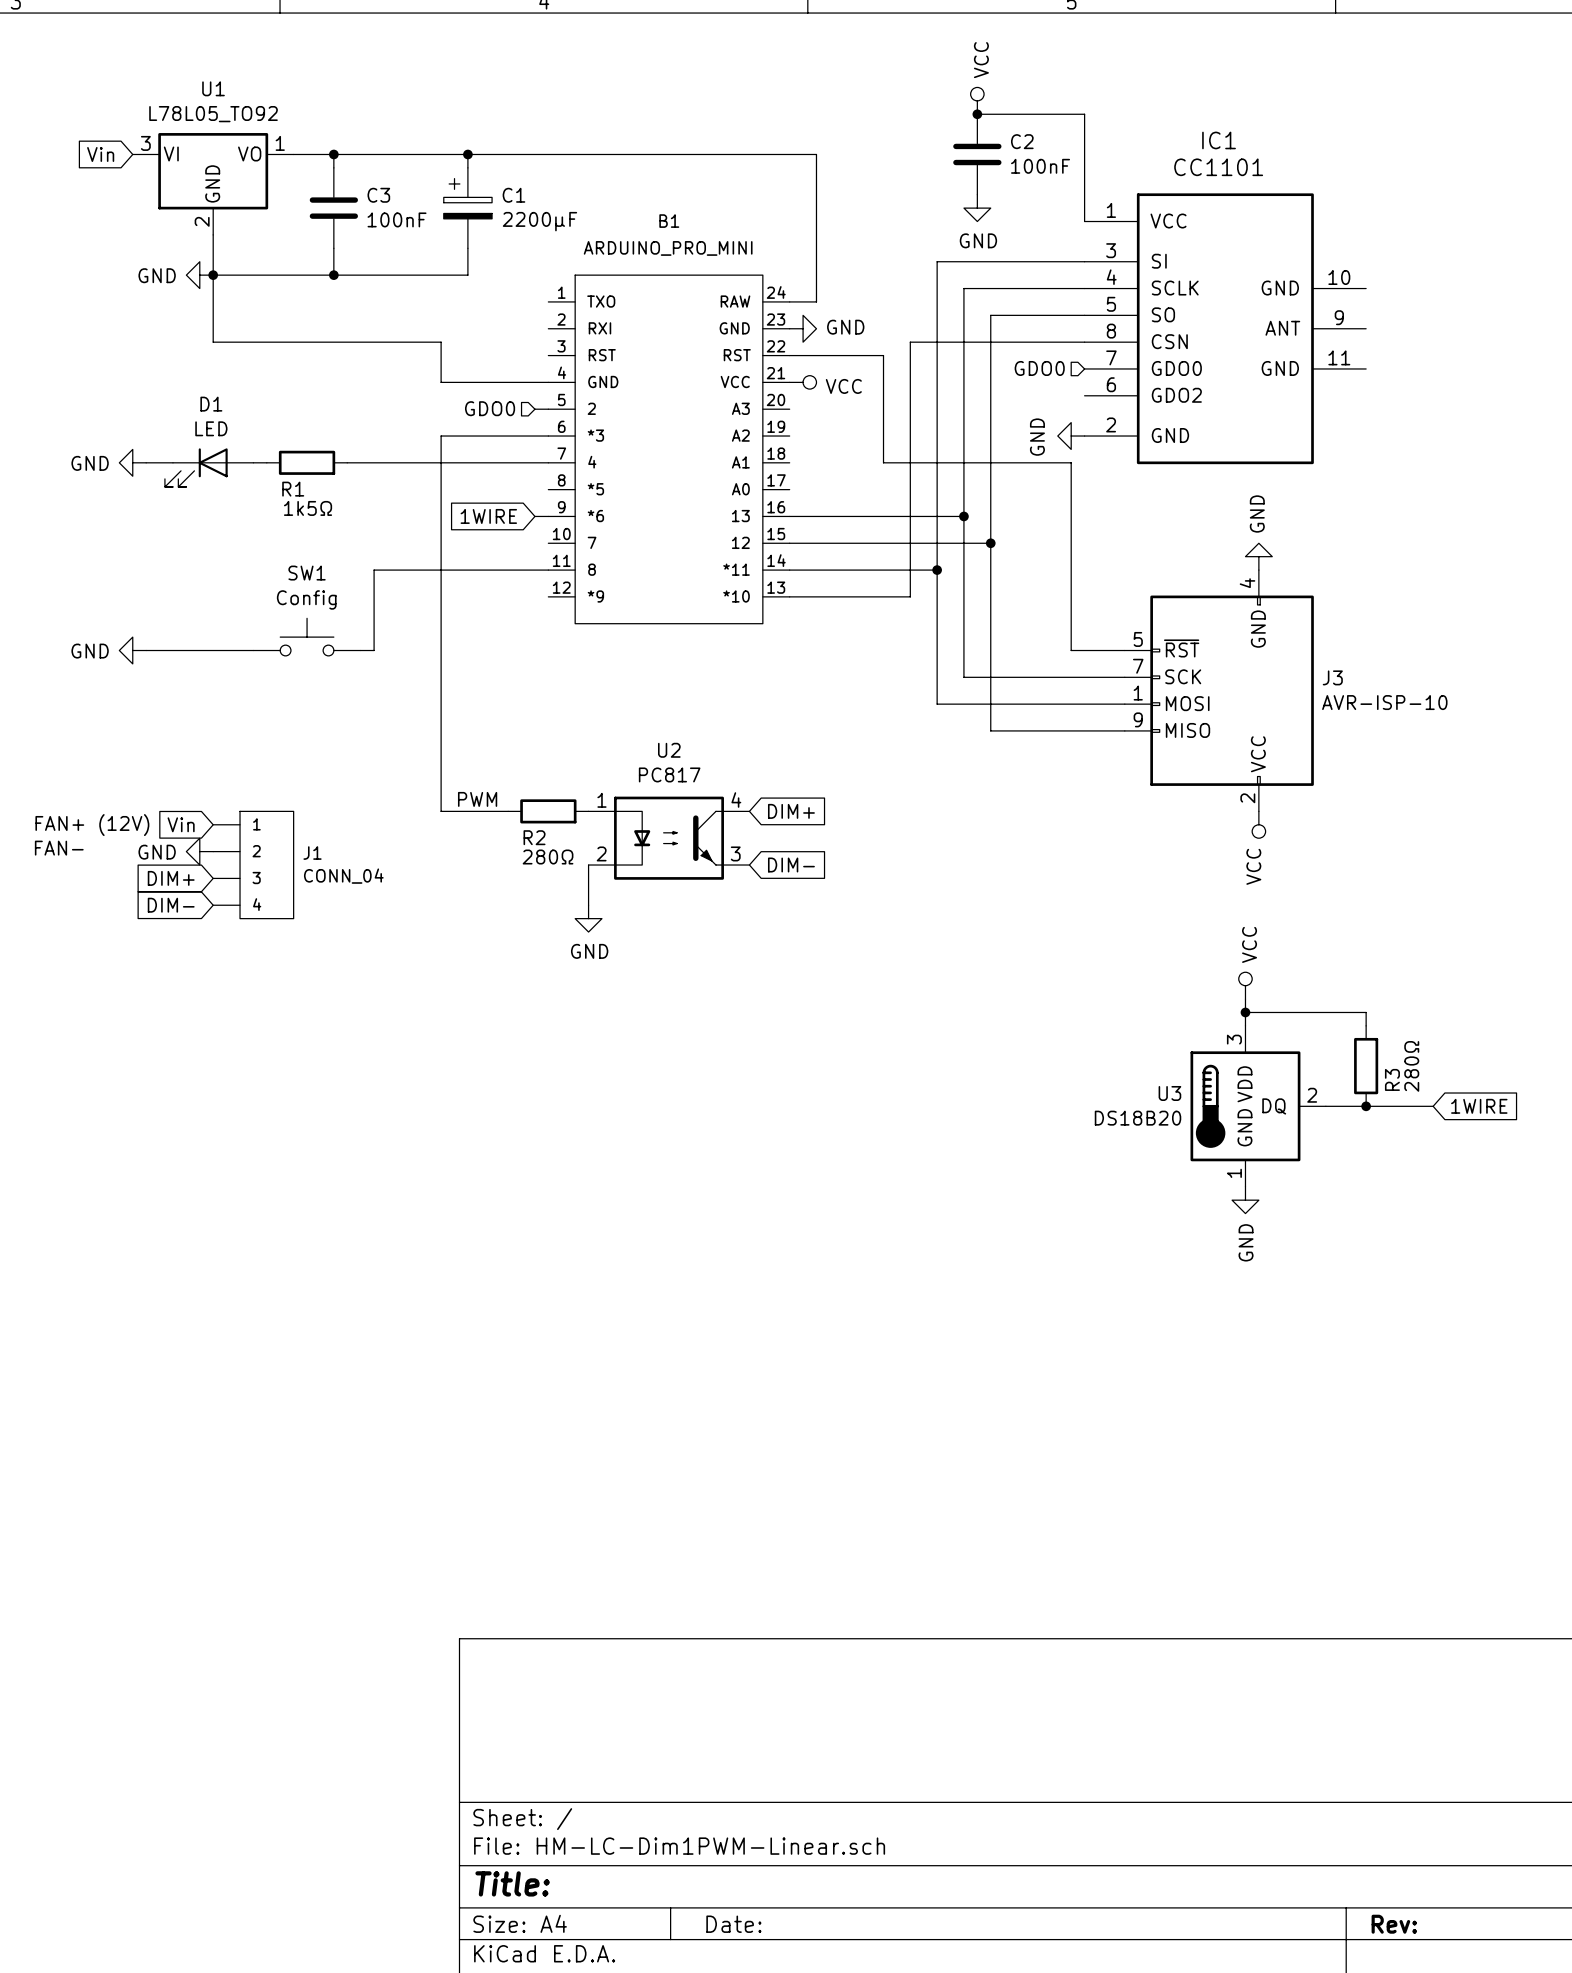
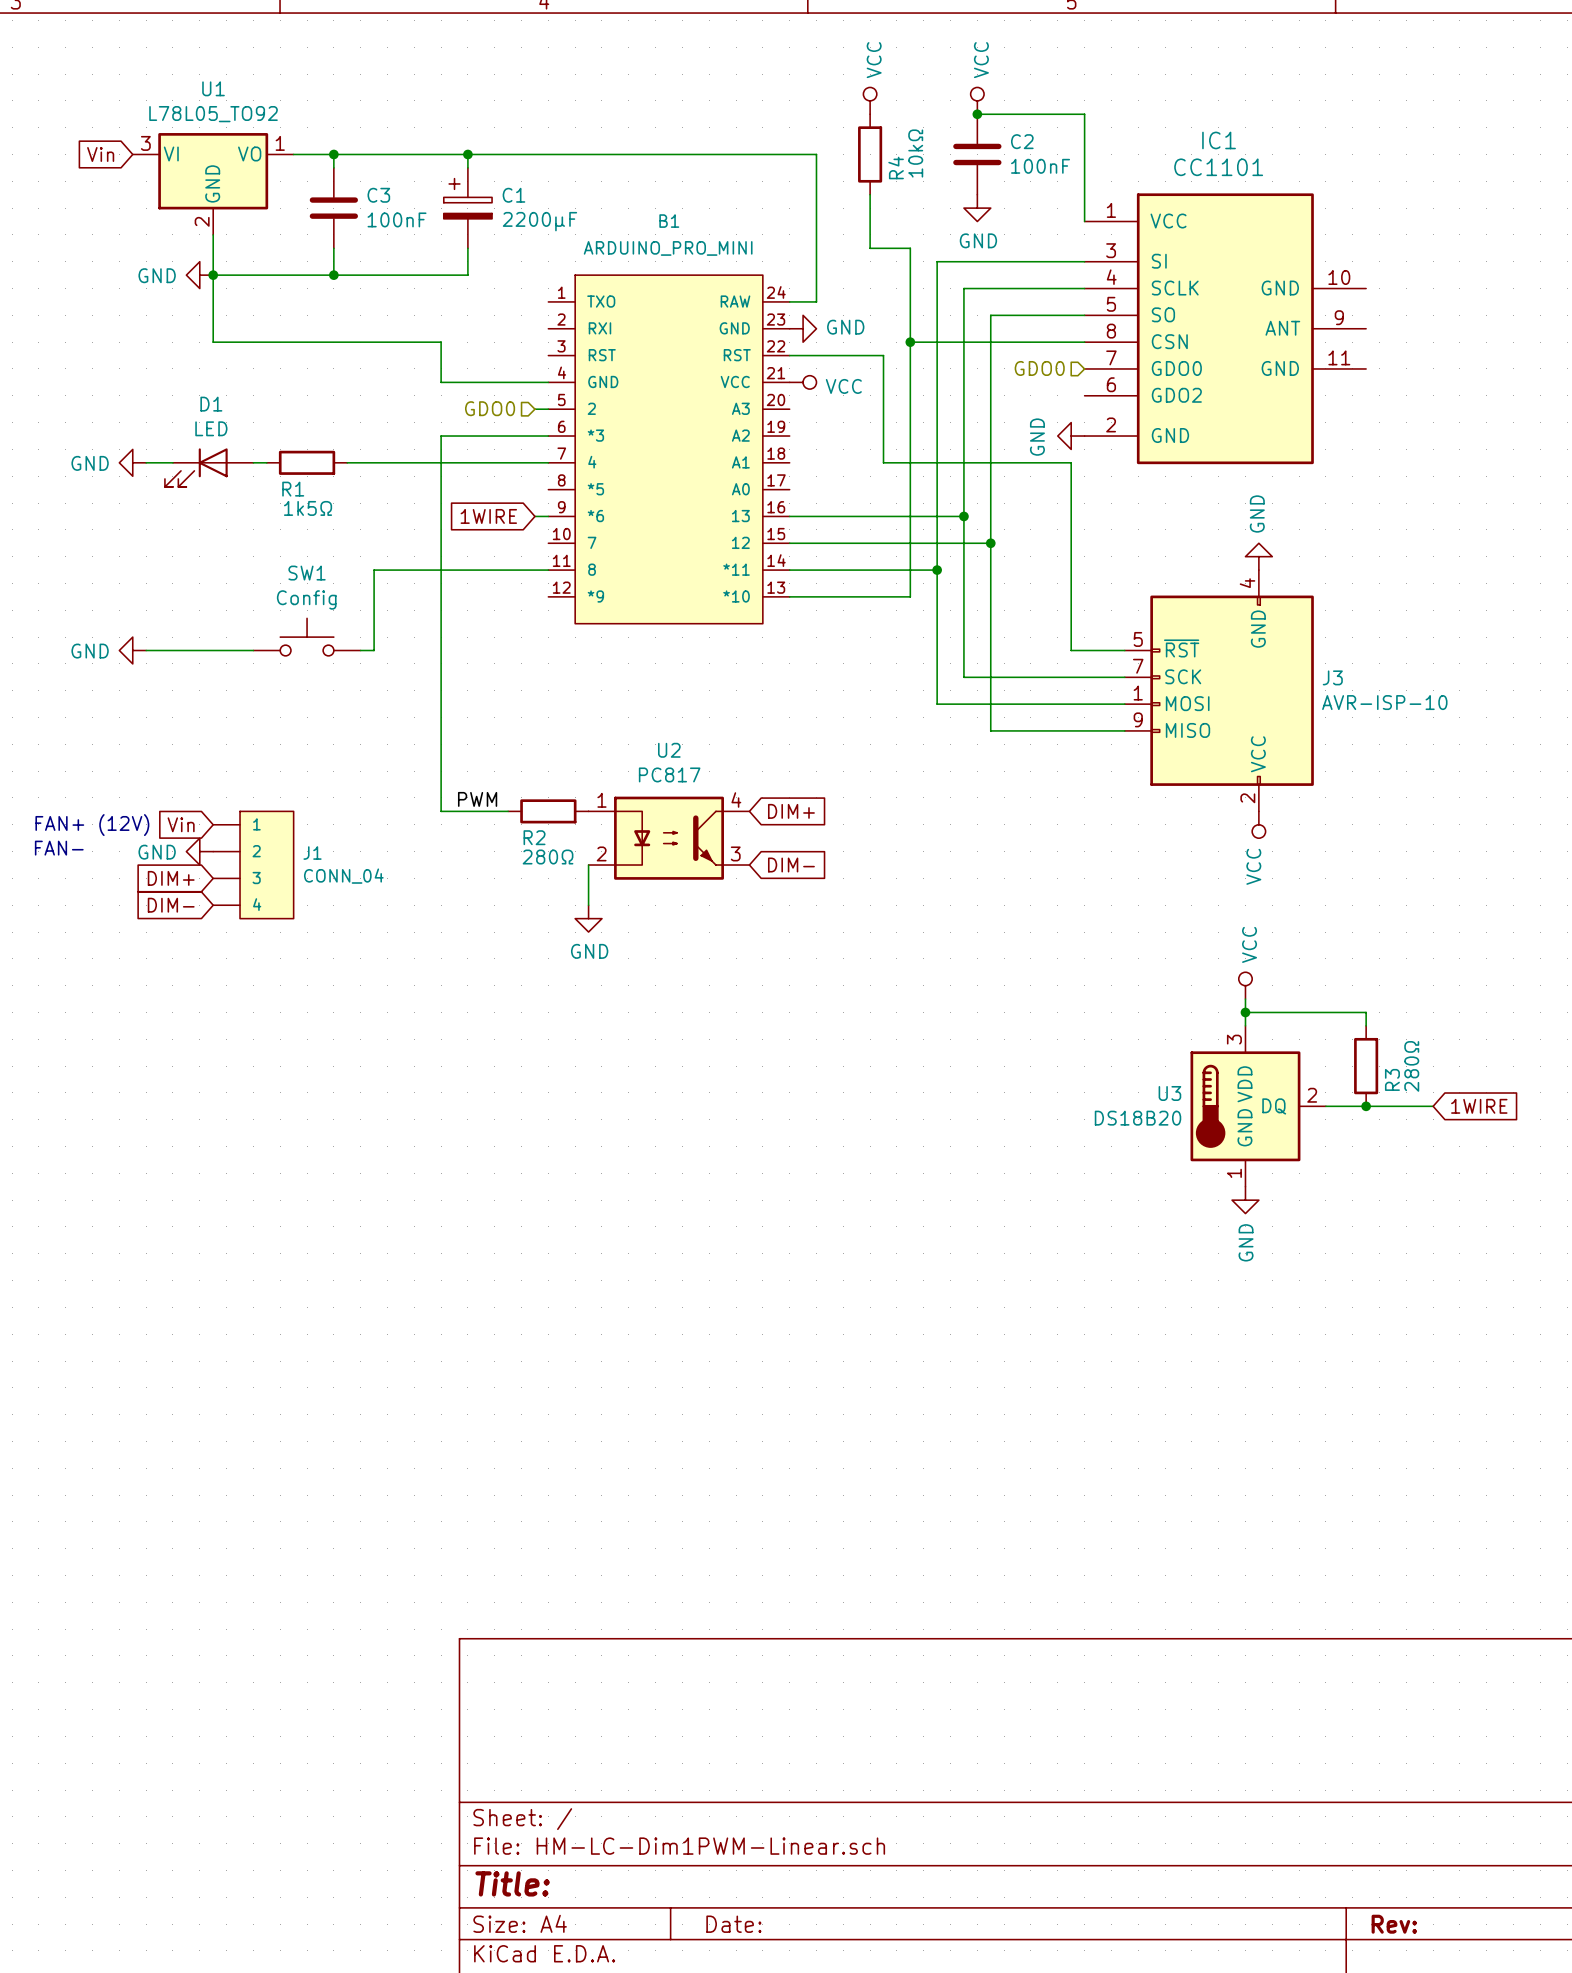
power symbol: none -> VCC (870, 100)
R4: none -> 10kΩ (870, 154)
wire: none -> (870, 194) (870, 248) (910, 248) (910, 342)
junction: none -> (910, 342)

